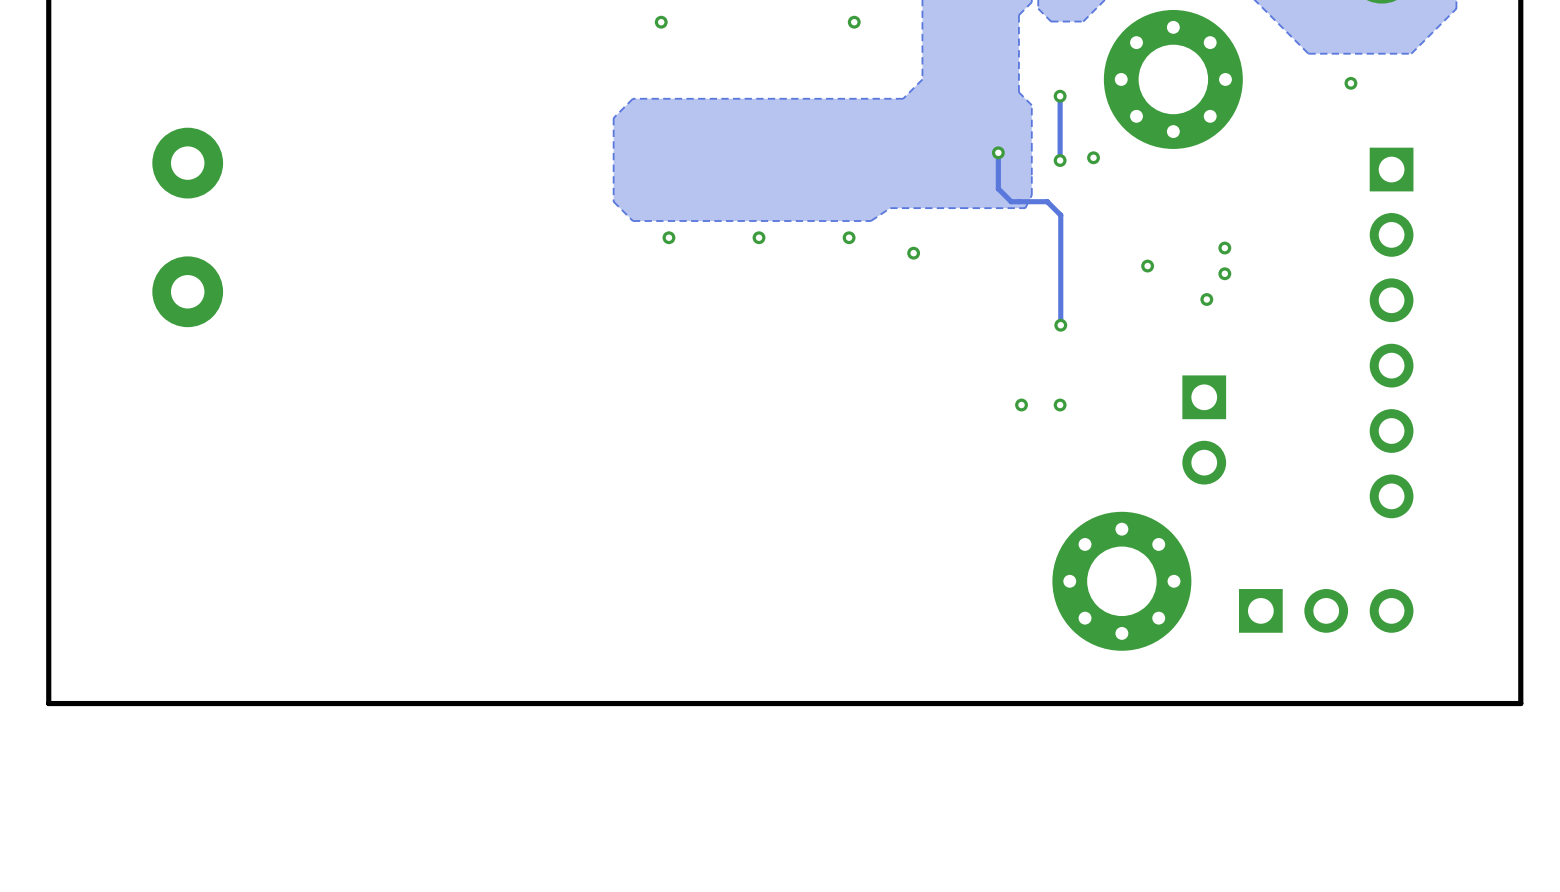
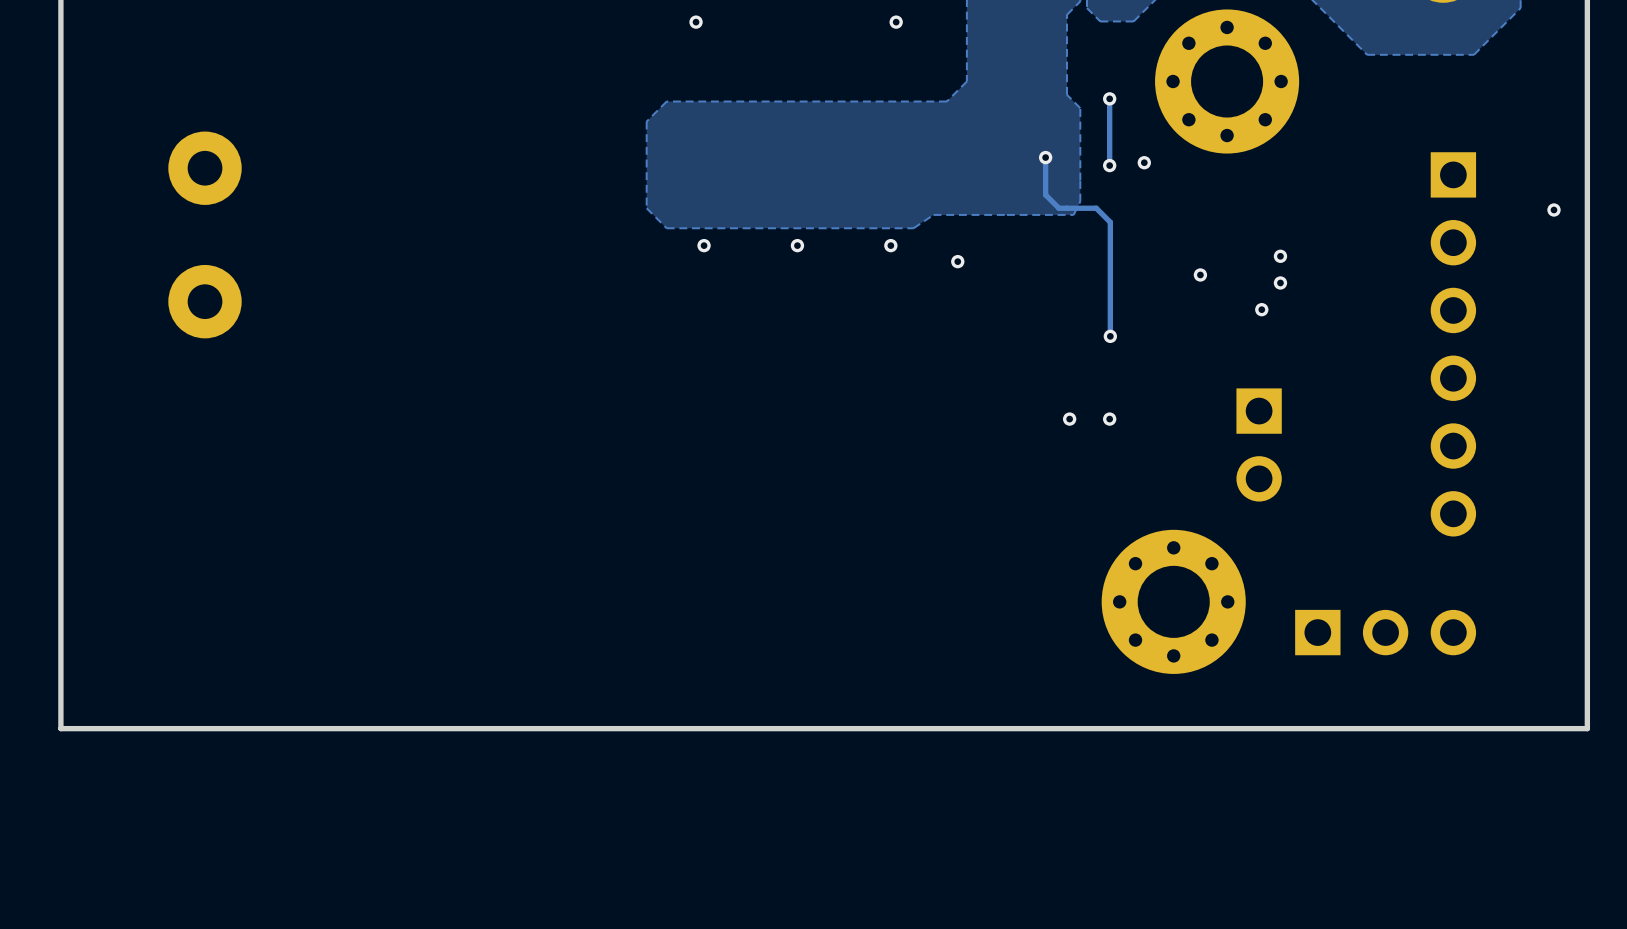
via: (1350, 83) -> none
via: none -> (1553, 209)

